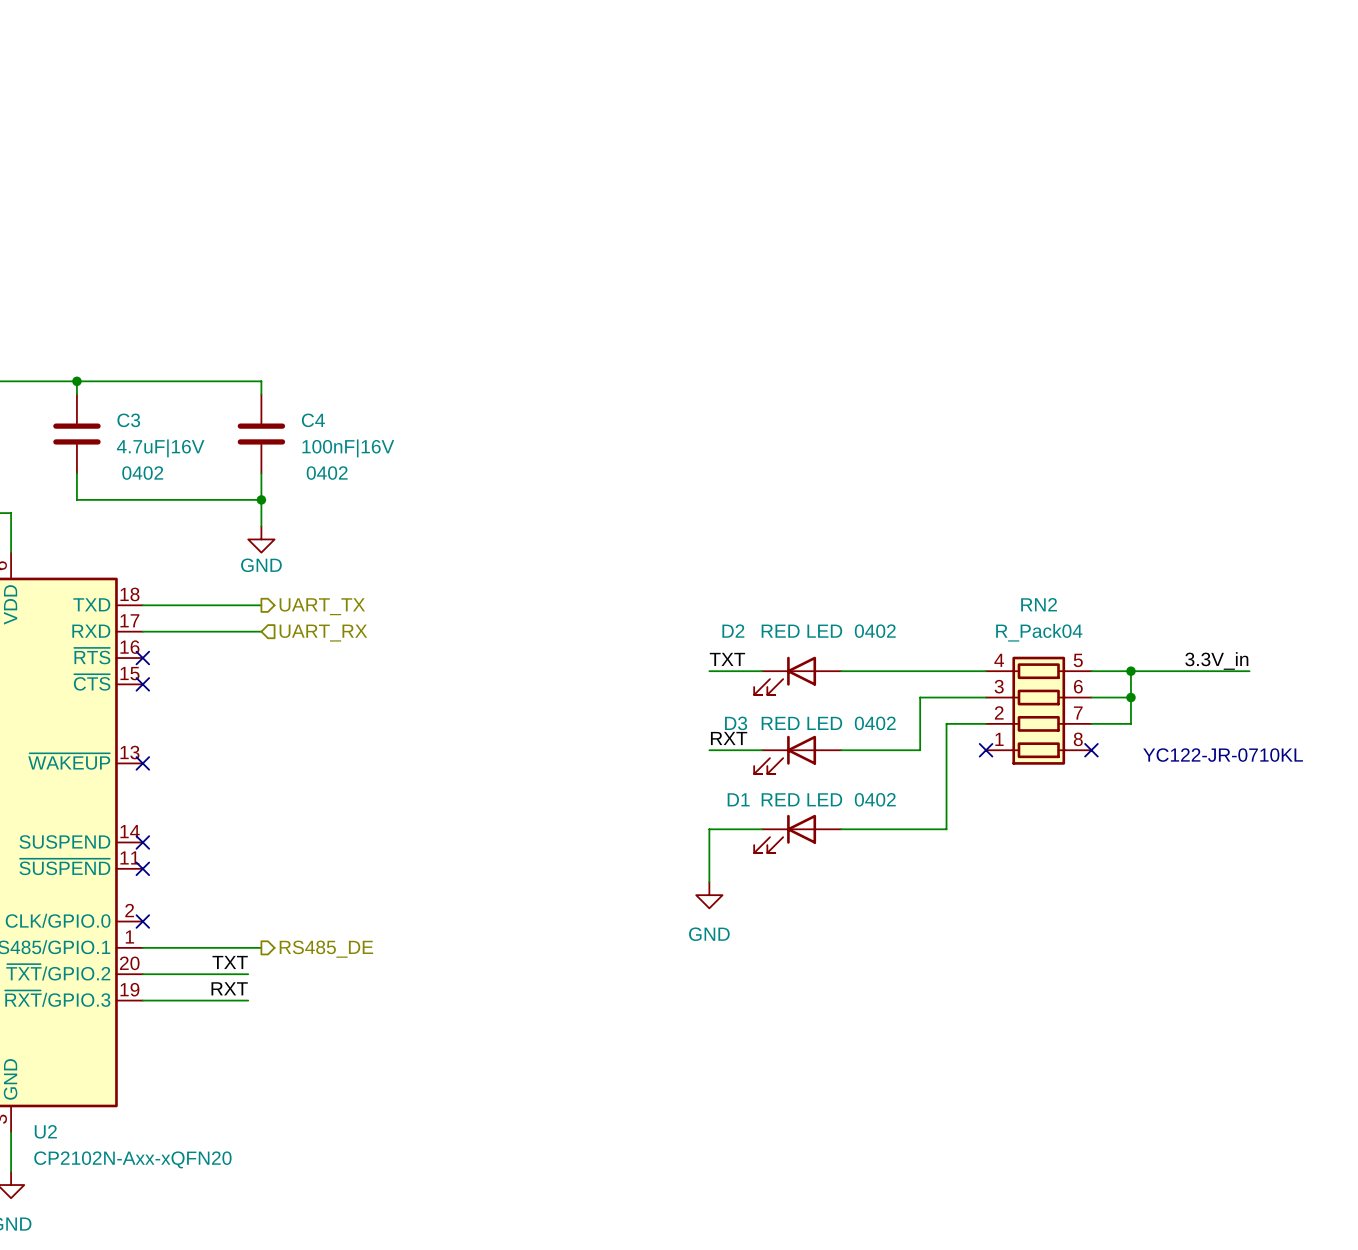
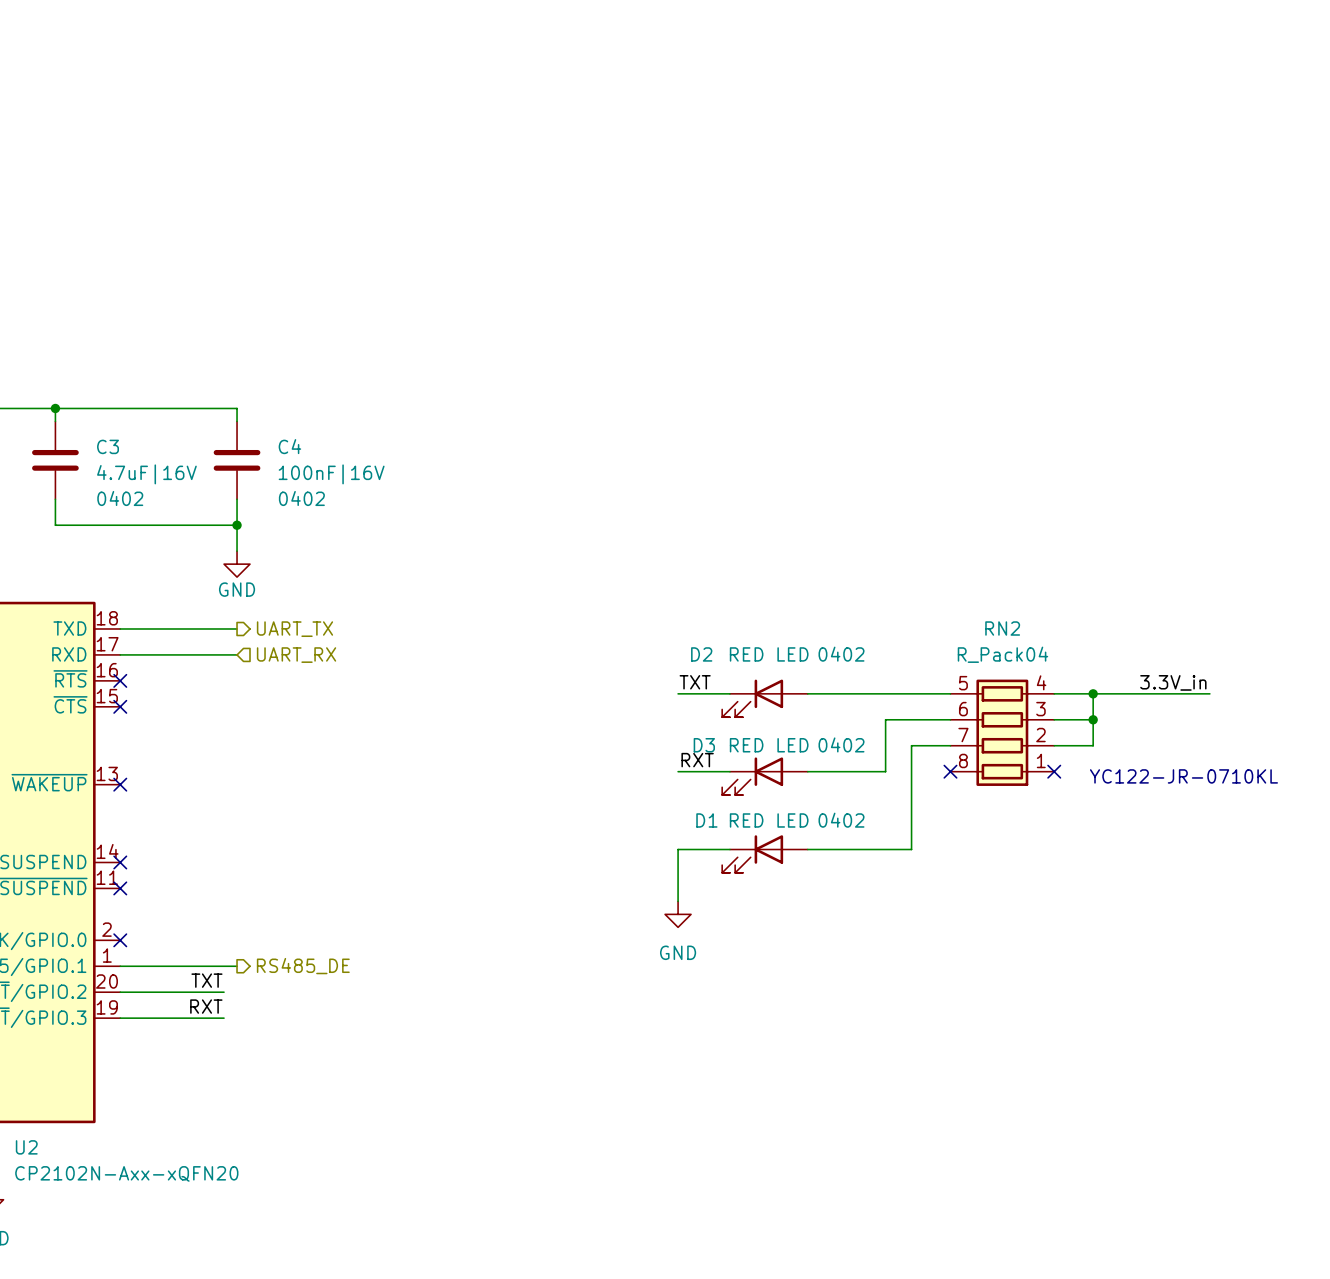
RN2 flip: as is (1038, 710) -> left-right (1002, 732)

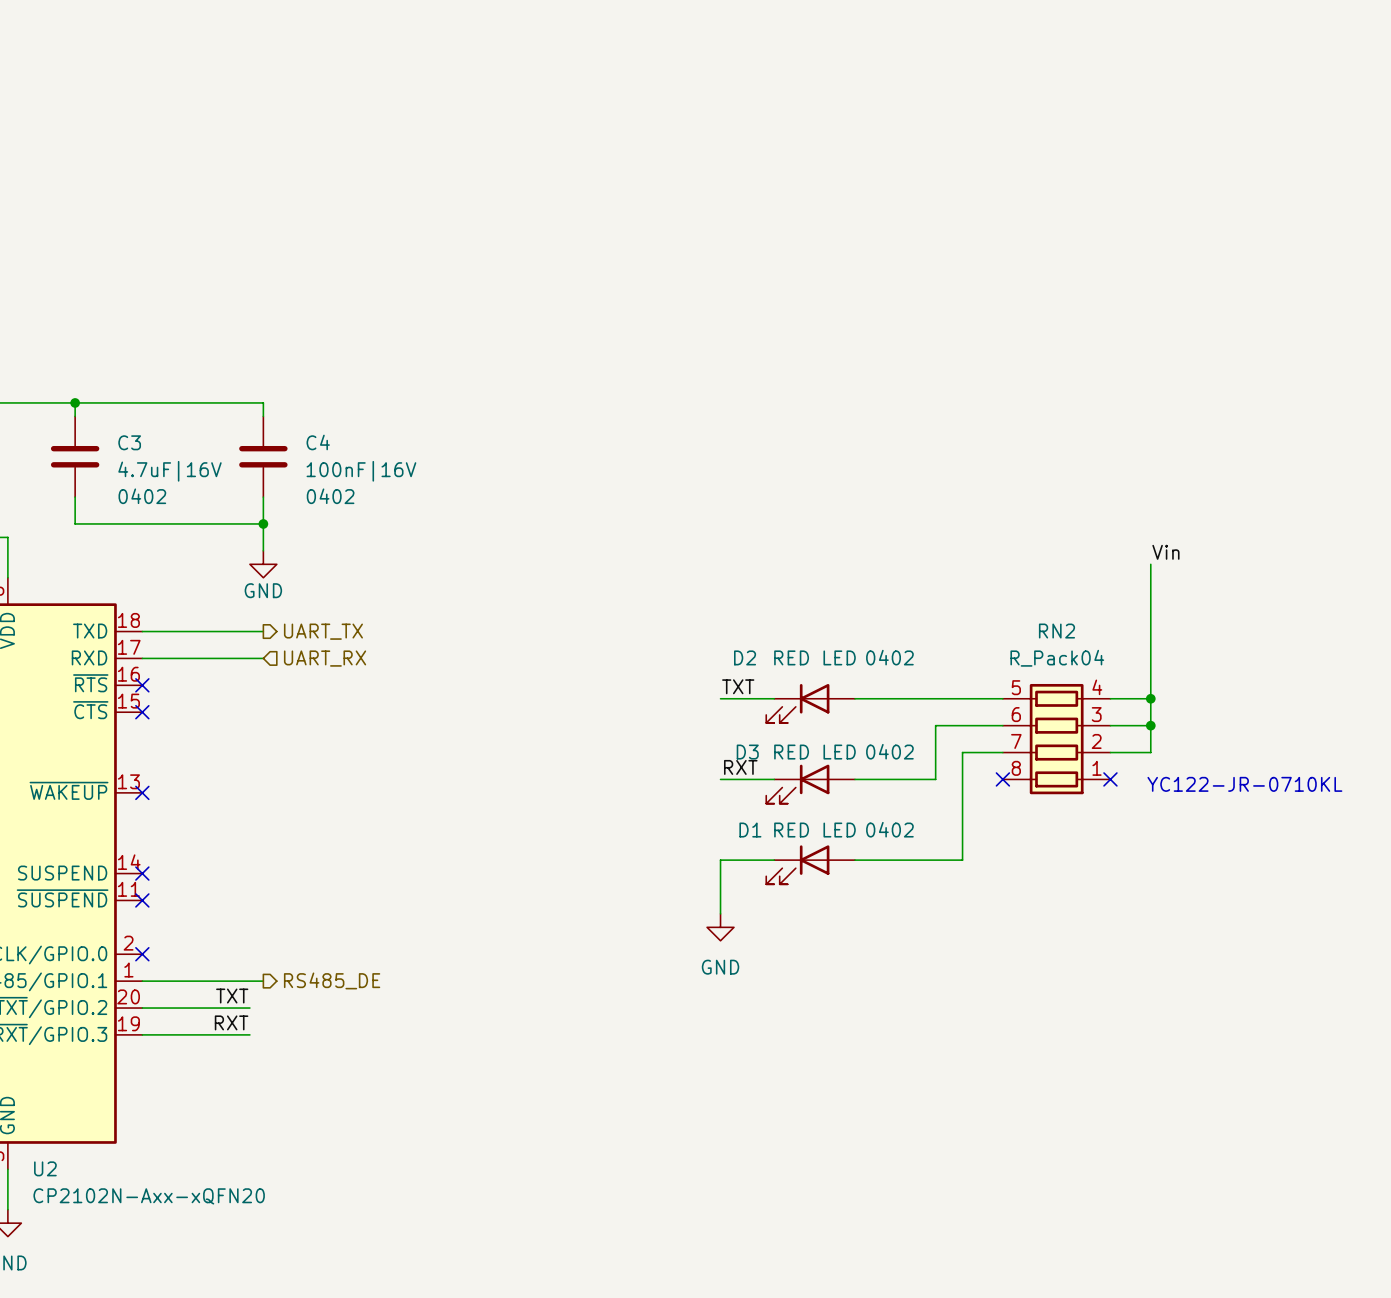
label: none -> Vin (1165, 552)
label: 3.3V_in (1173, 682) -> none
wire: (1093, 693) (1209, 693) -> (1150, 698) (1150, 564)

